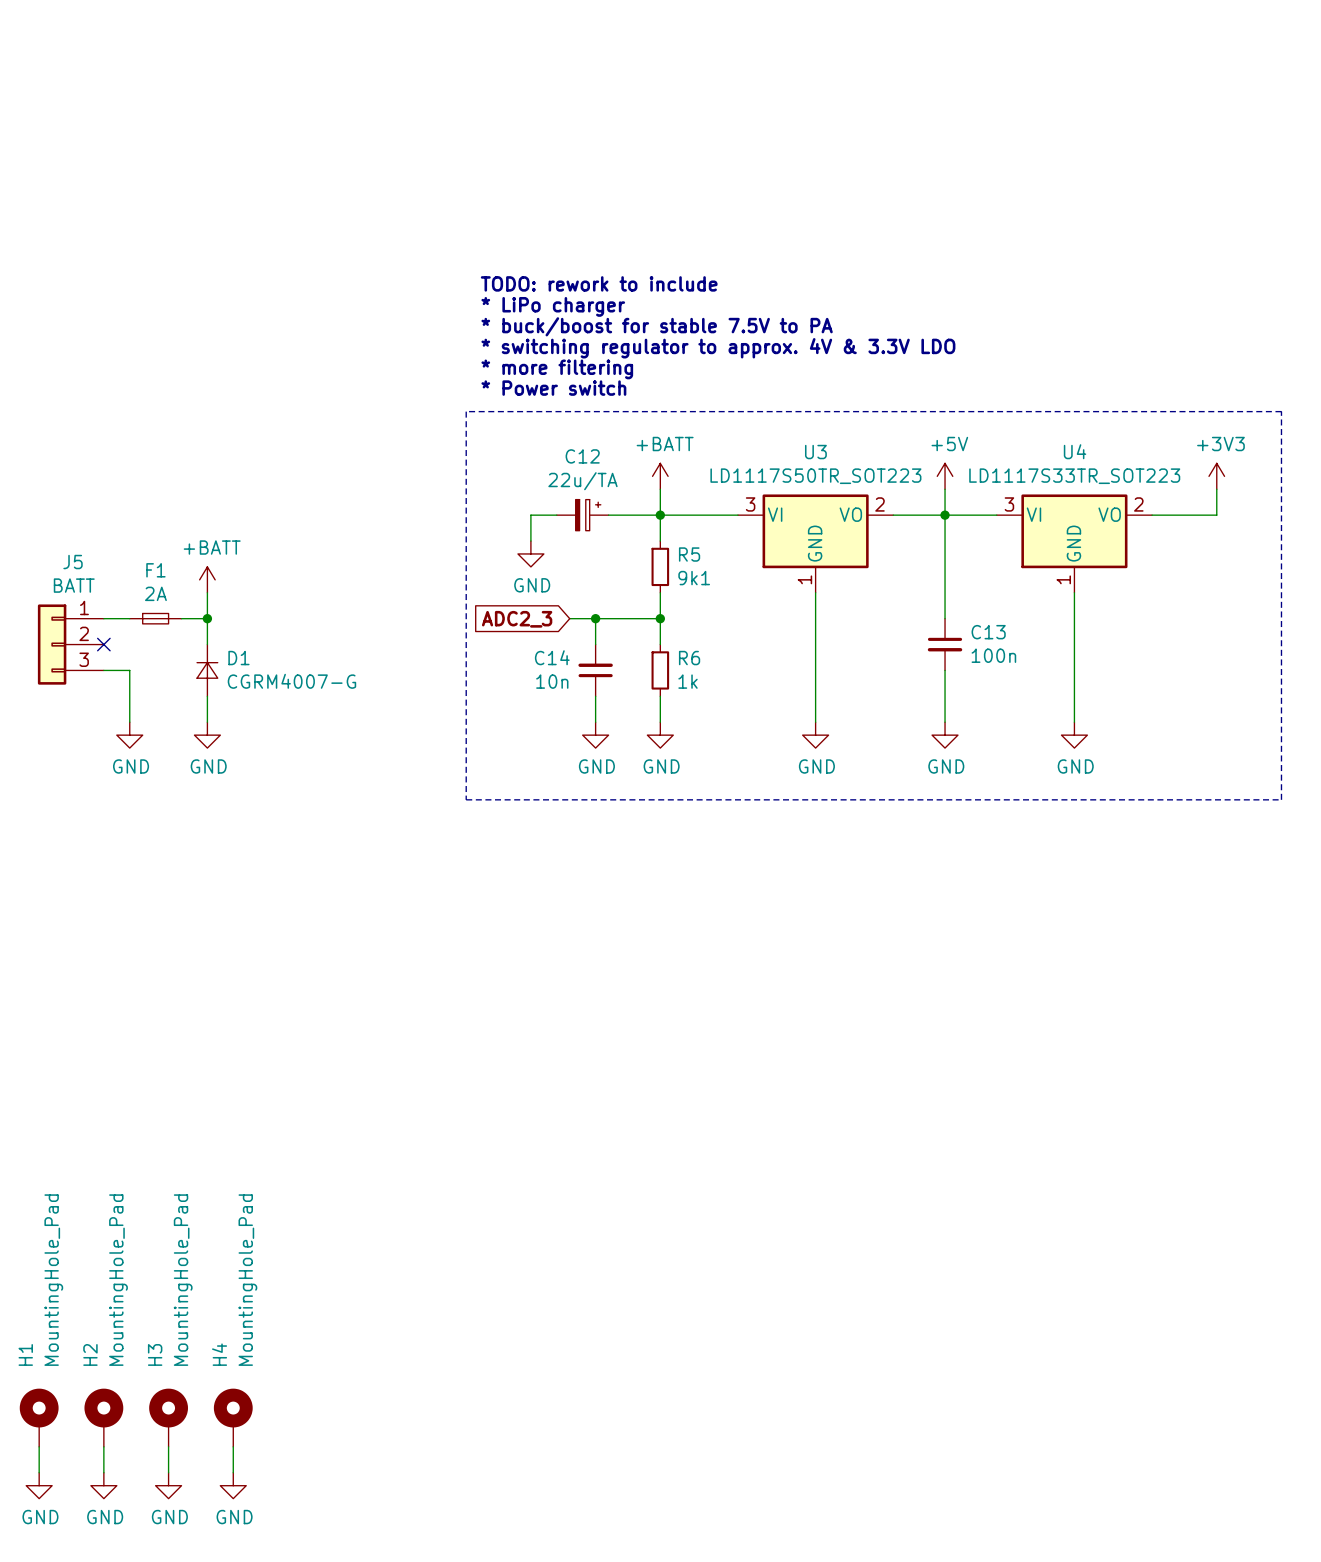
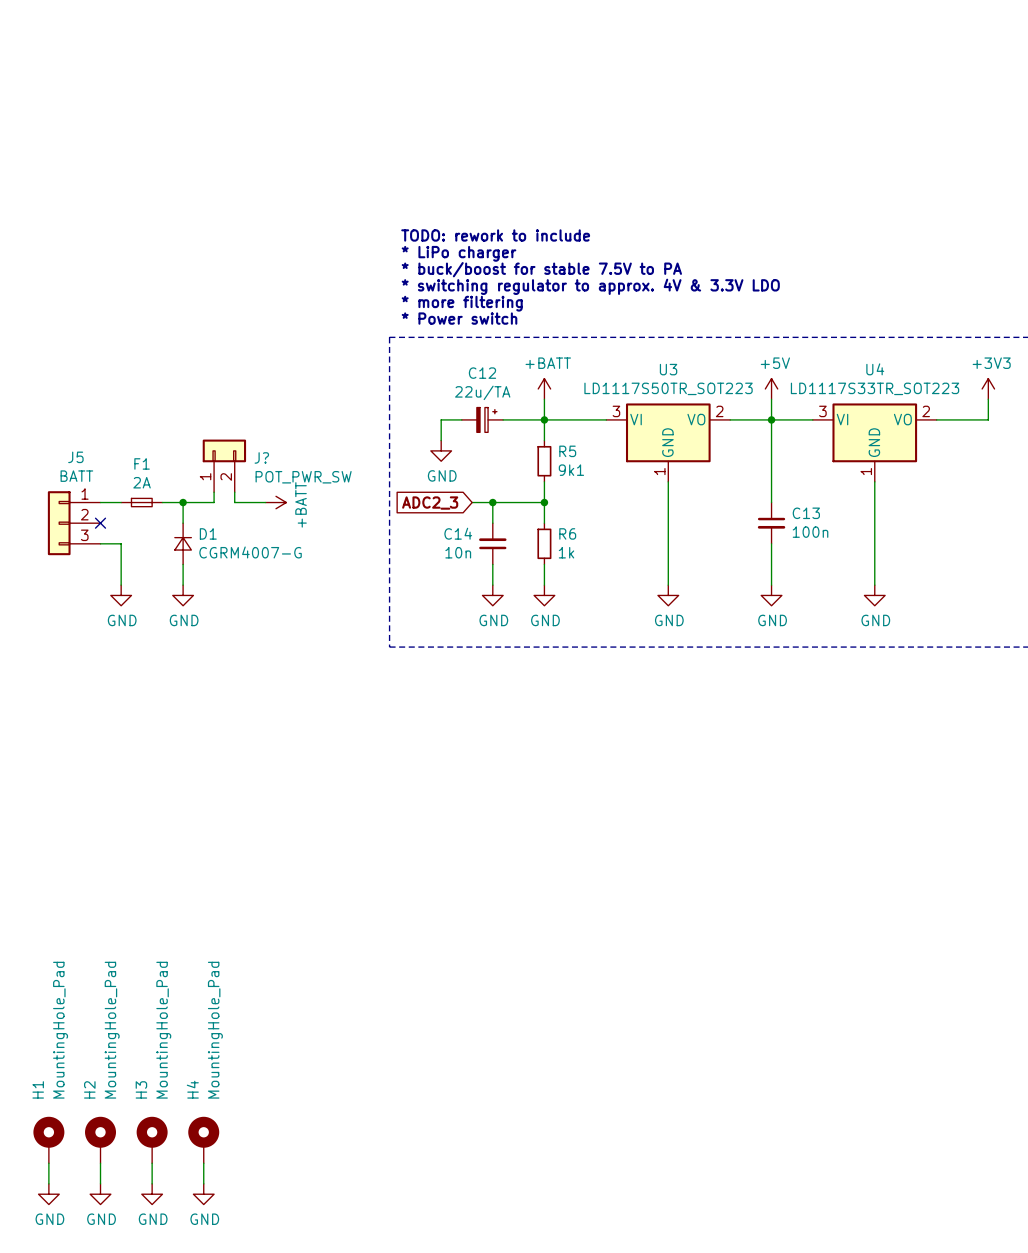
J?: none -> POT_PWR_SW (224, 465)
power symbol rotation: 0° (207, 579) -> 90° clockwise (276, 502)
power symbol position: +BATT (207, 579) -> +BATT (276, 502)
wire: (207, 592) (207, 618) -> (214, 492) (214, 502) (183, 502)
wire: none -> (234, 492) (234, 502) (265, 502)

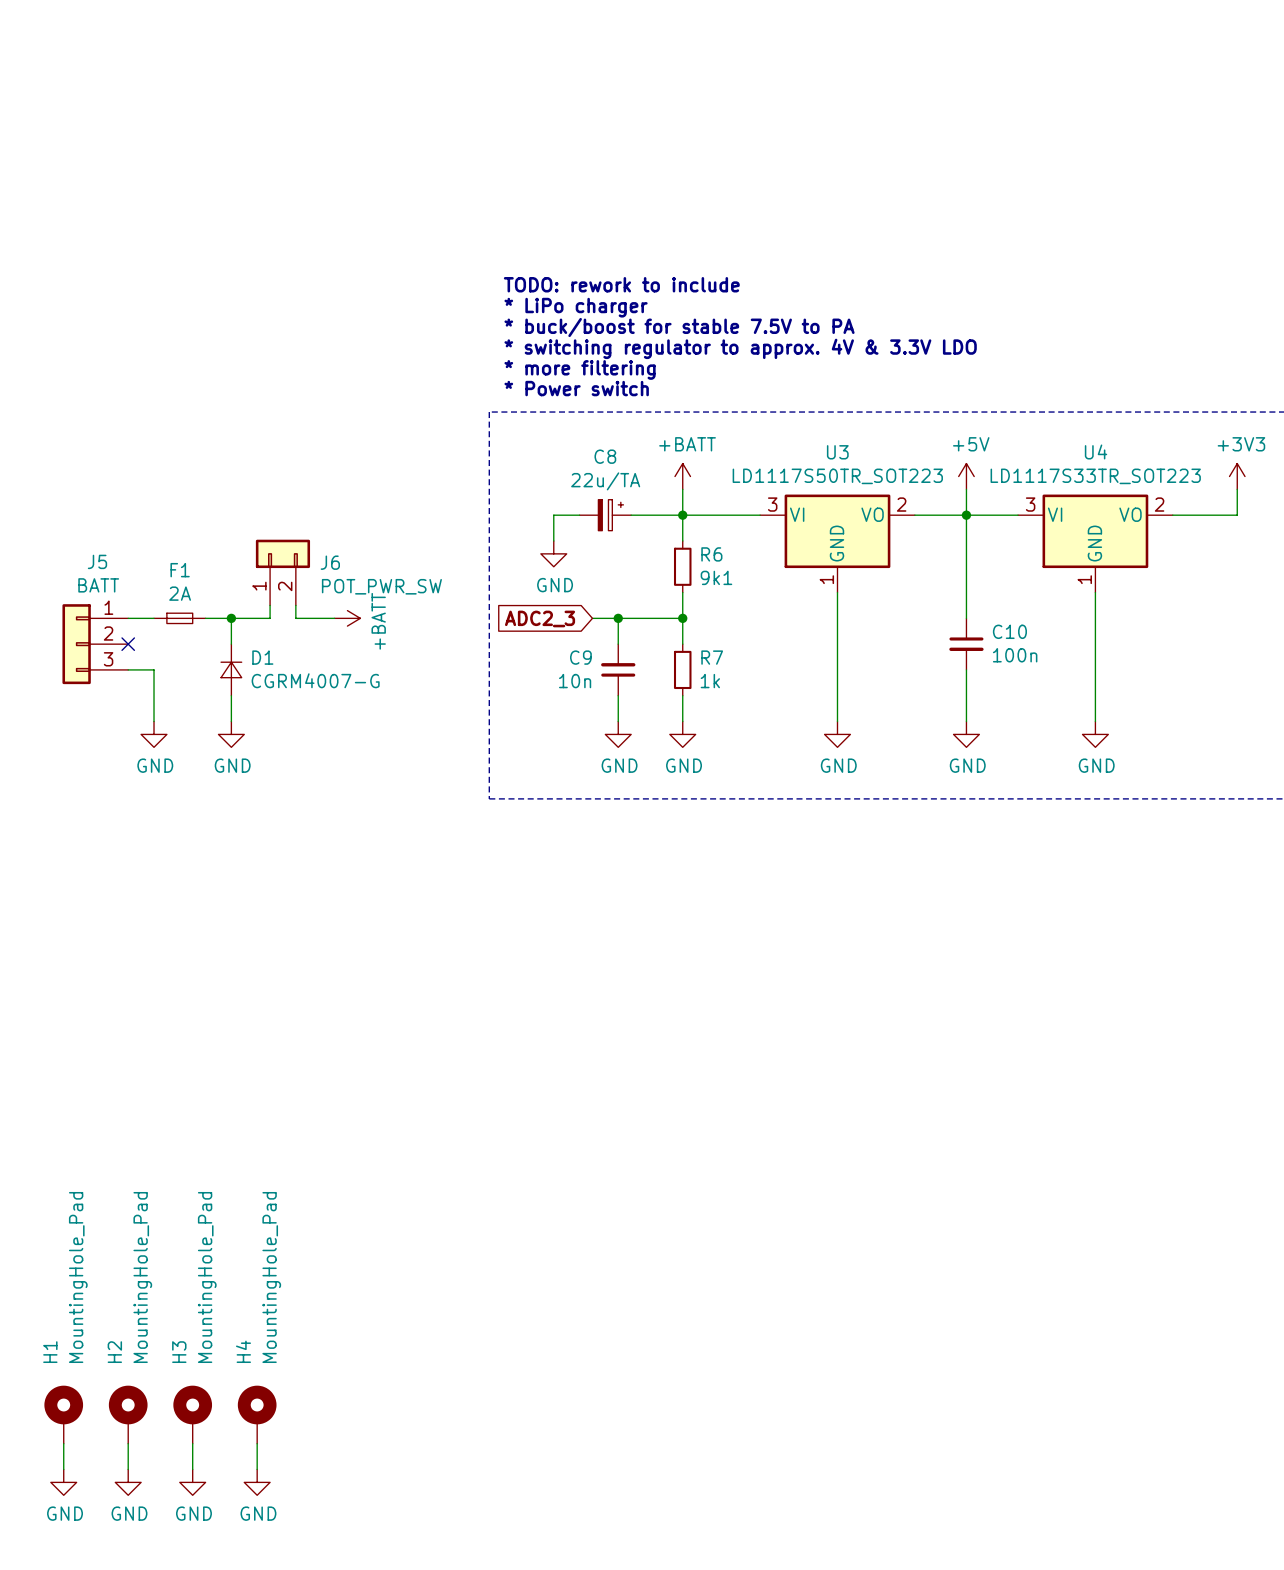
C12 name: C12 (482, 373) -> C8 (605, 456)
R5 name: R5 (567, 451) -> R6 (711, 554)
J? name: J? (261, 457) -> J6 (330, 562)
C13 name: C13 (806, 513) -> C10 (1009, 631)
C14 name: C14 (458, 533) -> C9 (580, 657)
R6 name: R6 (567, 533) -> R7 (712, 657)

